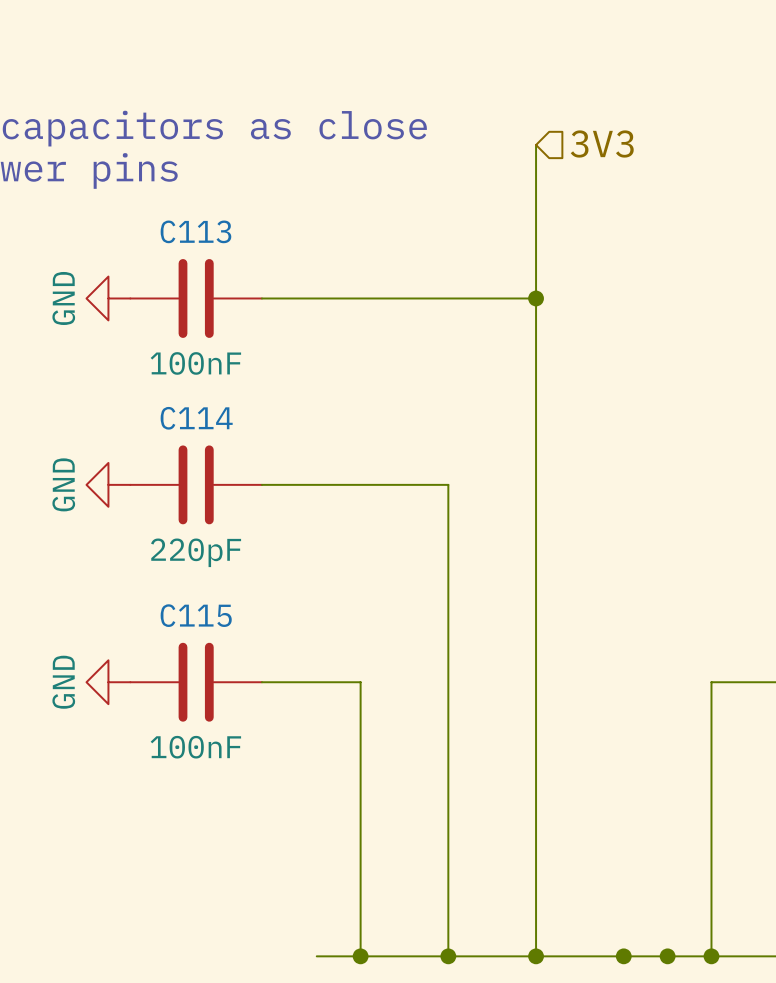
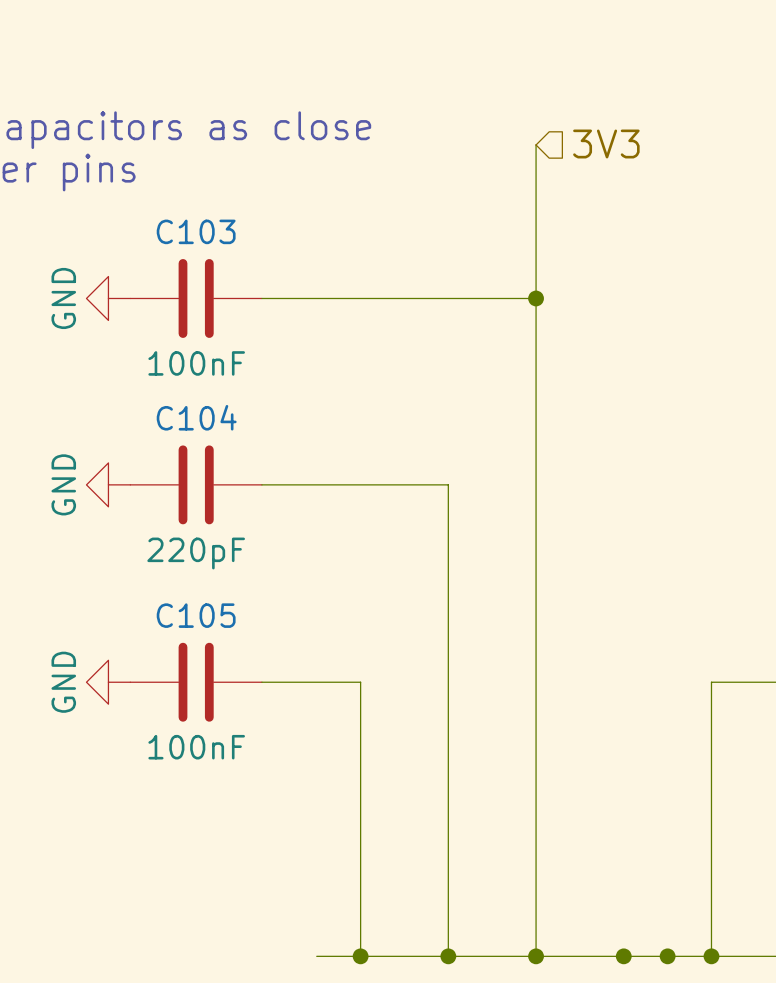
C113 name: C113 (195, 231) -> C103 (196, 231)
C114 name: C114 (196, 418) -> C104 (196, 417)
C115 name: C115 (196, 615) -> C105 (196, 615)

